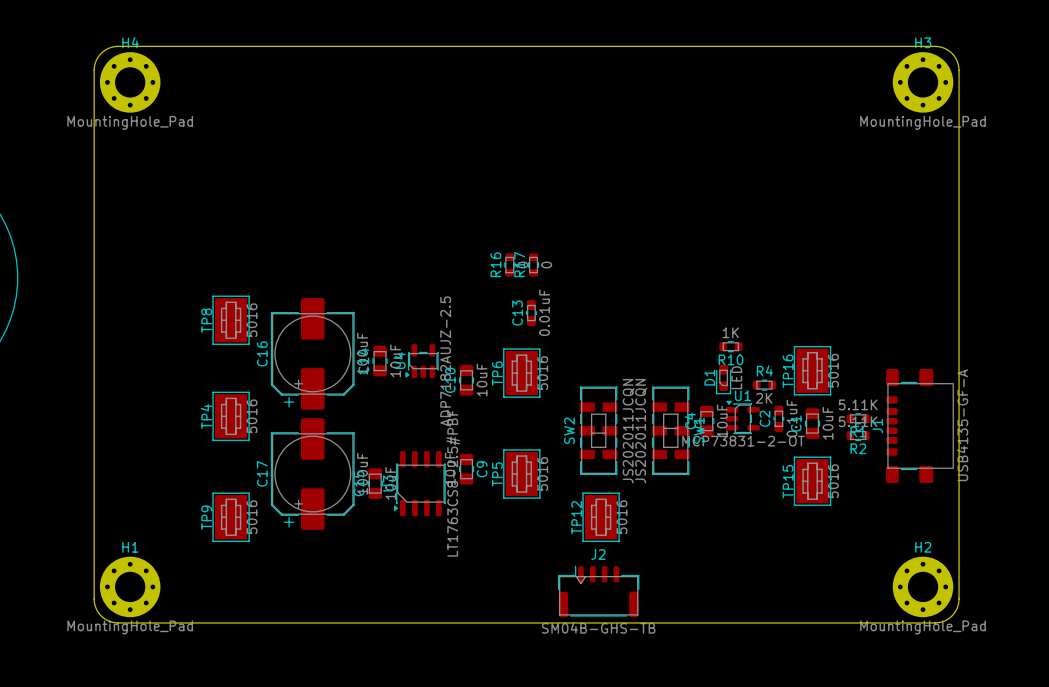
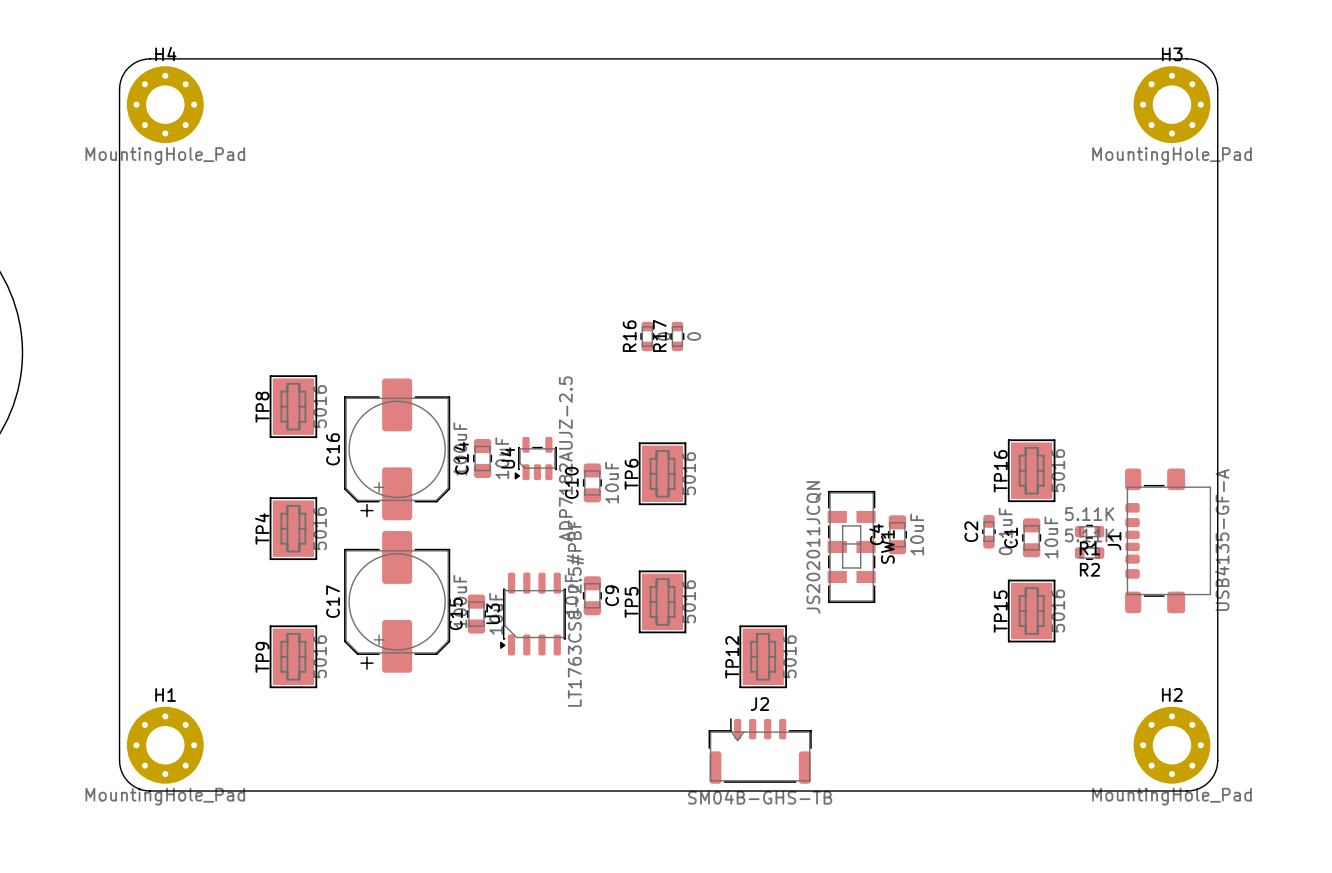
C13: 0.01uF (531, 313) -> none
R10: 1K (730, 346) -> none
D1: LED (723, 379) -> none
R4: 2K (764, 385) -> none
U1: MCP73831-2-OT (742, 417) -> none
SW2: JS202011JCQN (598, 430) -> none

